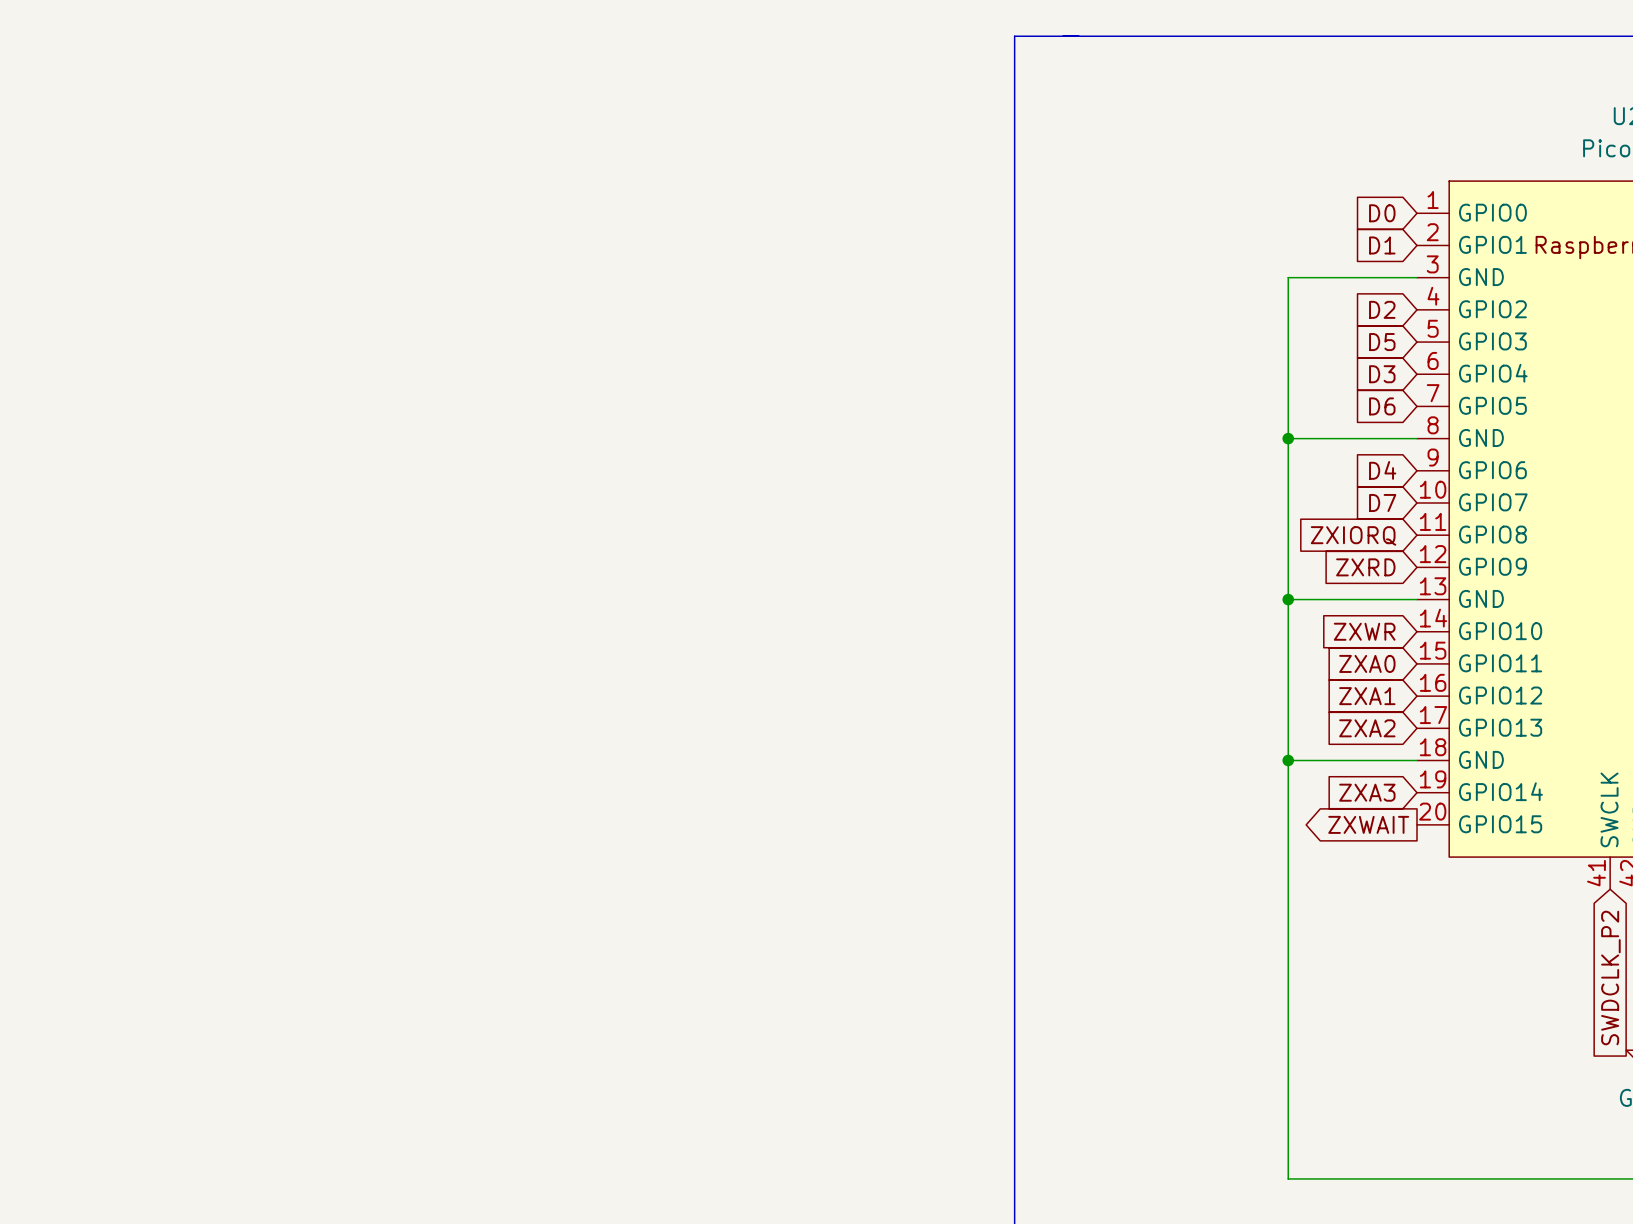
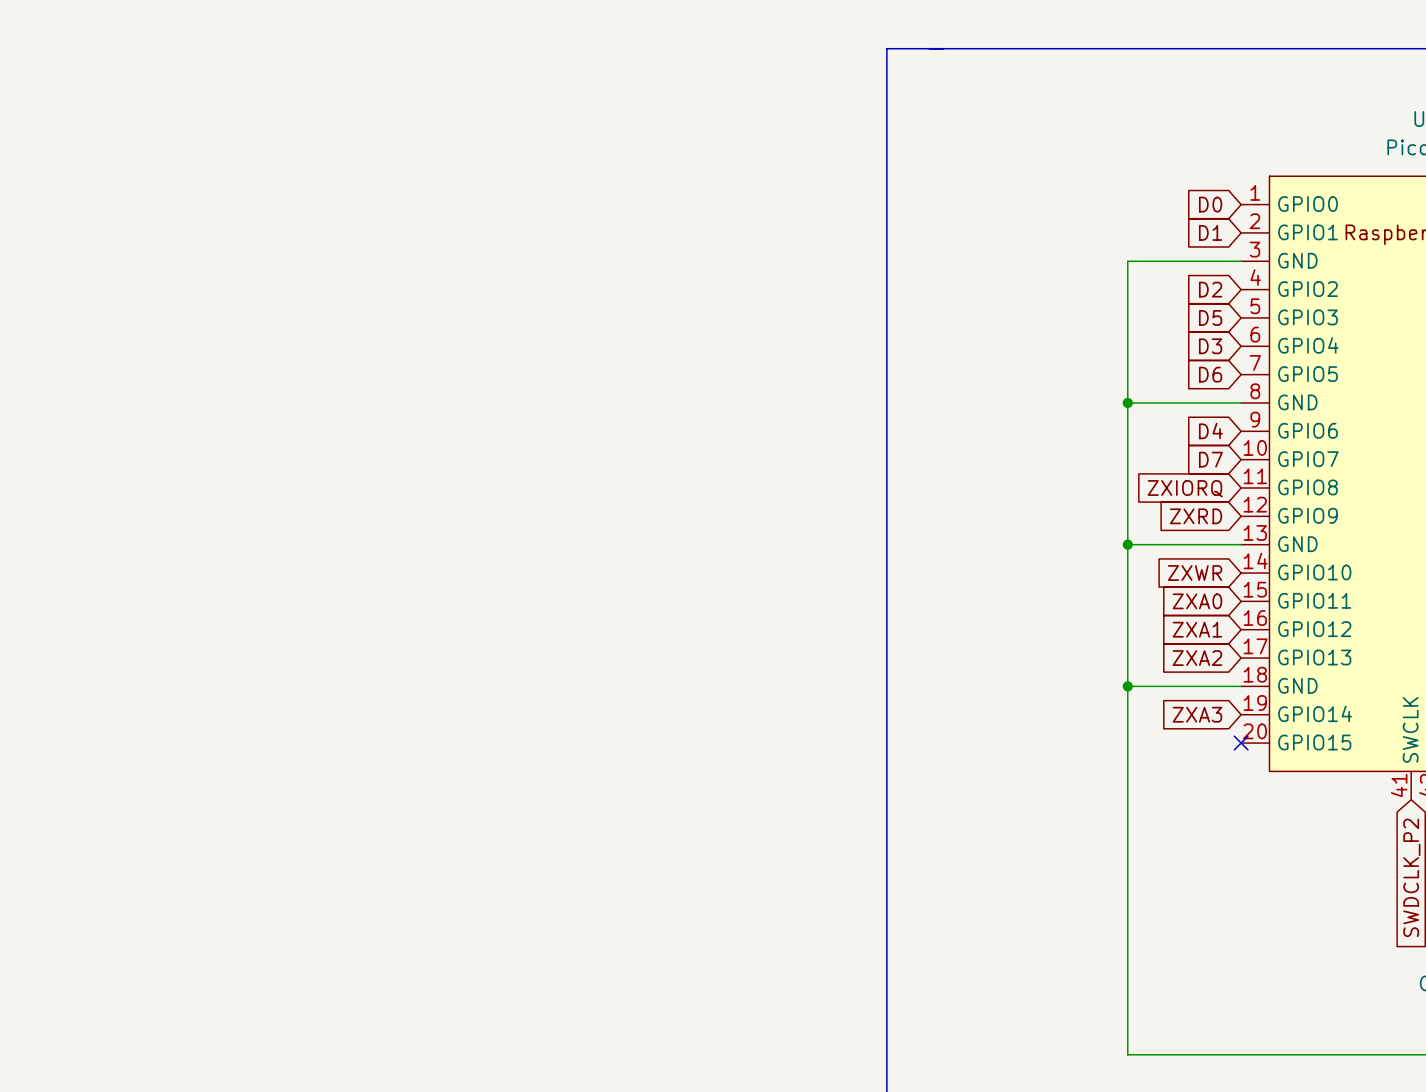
global label: ZXWAIT (1368, 824) -> none
no-connect mark: none -> (1241, 743)

